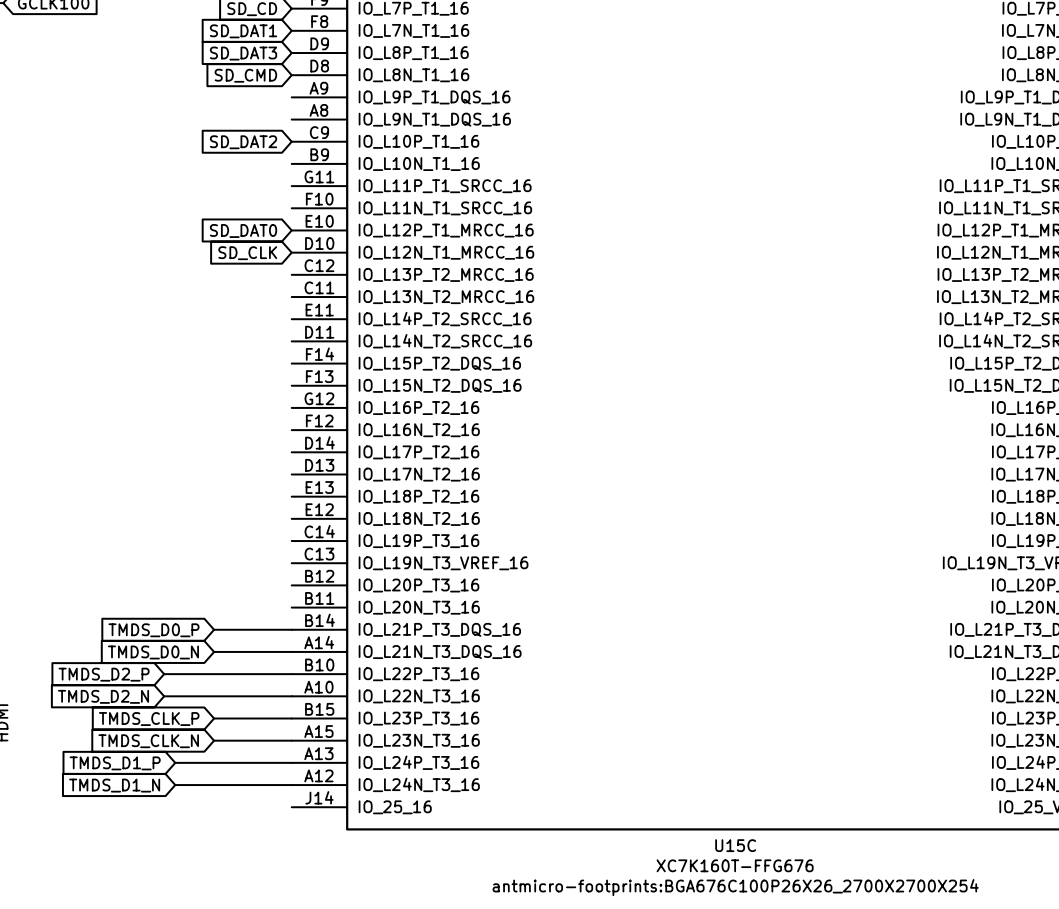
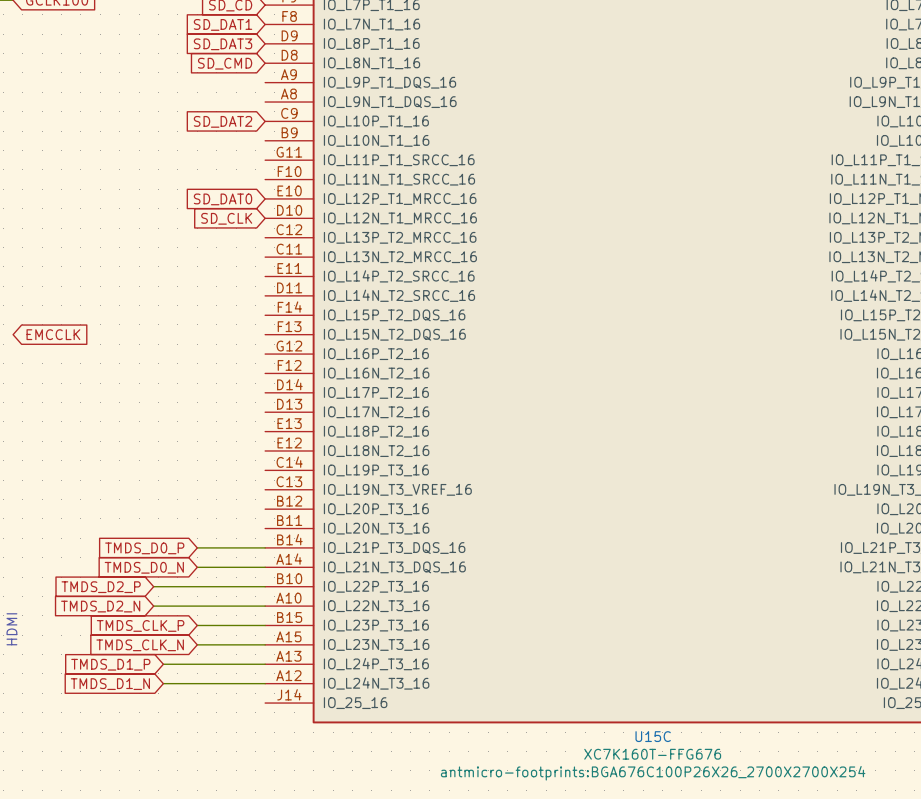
global label: none -> EMCCLK (53, 334)

